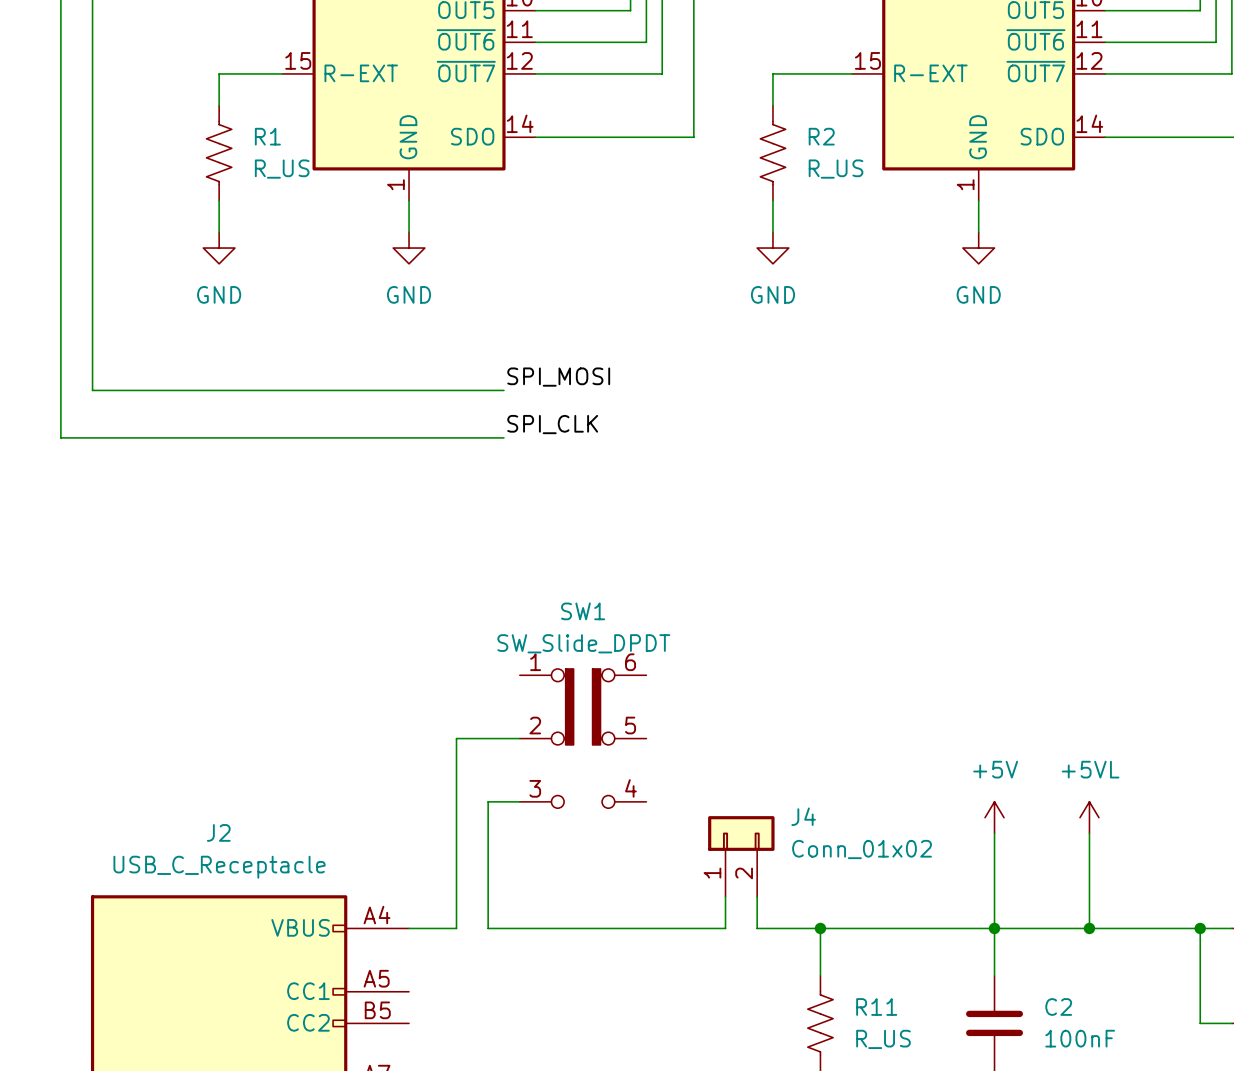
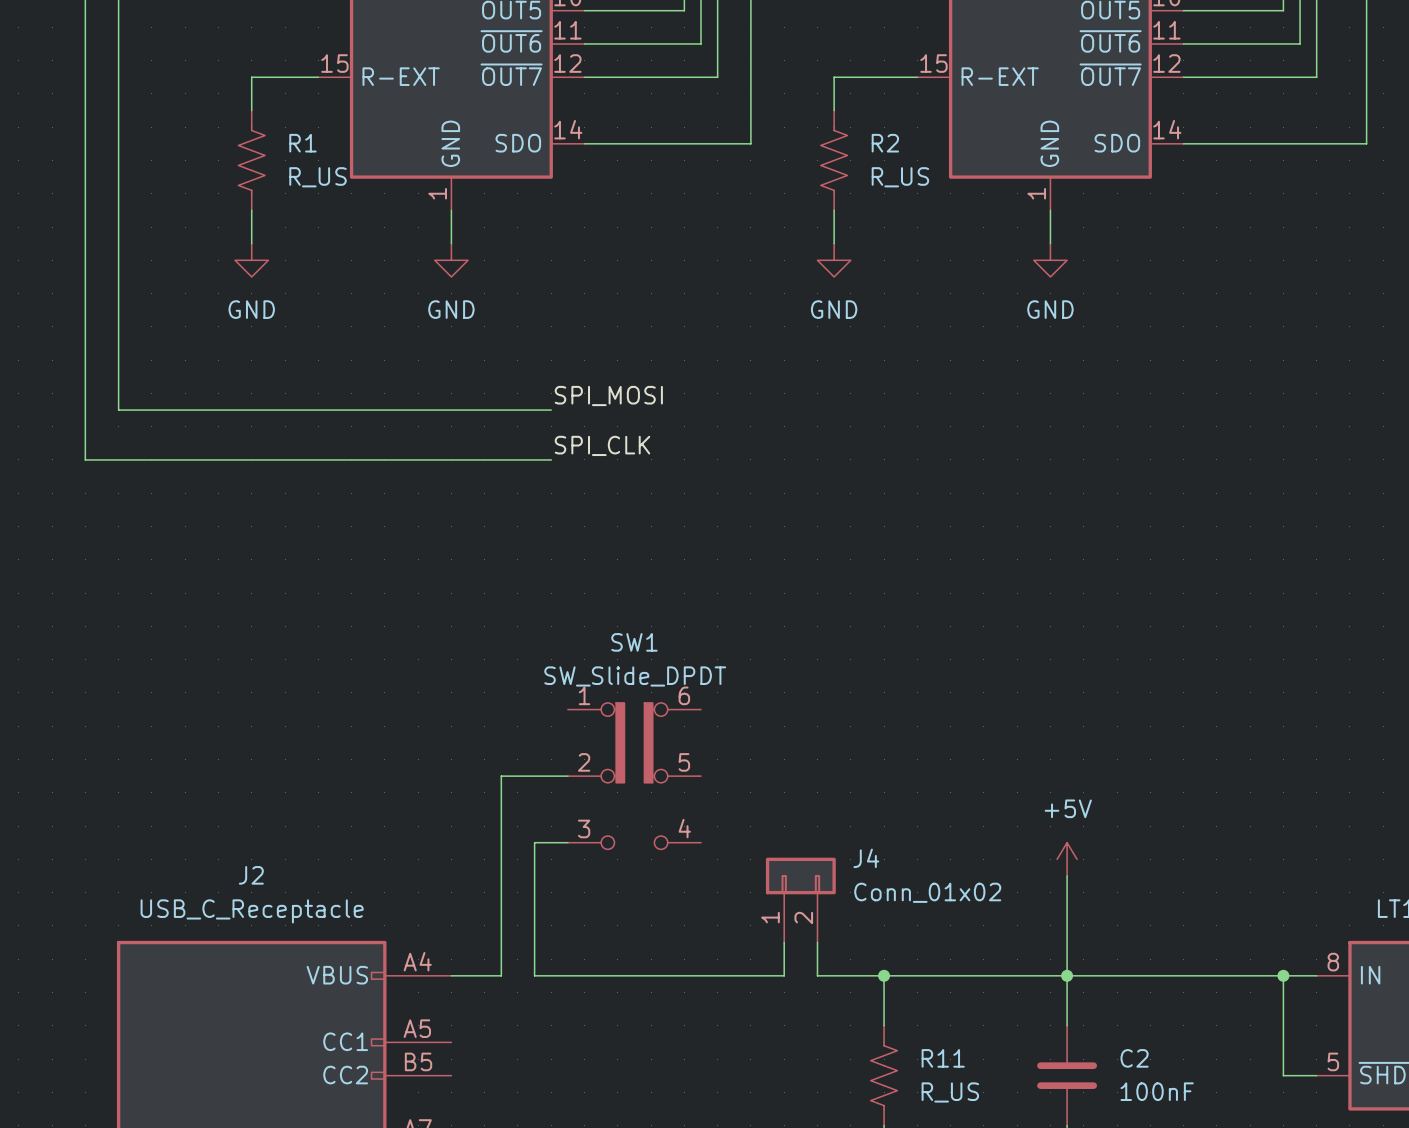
power symbol: +5VL (1089, 817) -> none
wire: (1089, 833) (1089, 928) -> none
junction: (1089, 928) -> none

